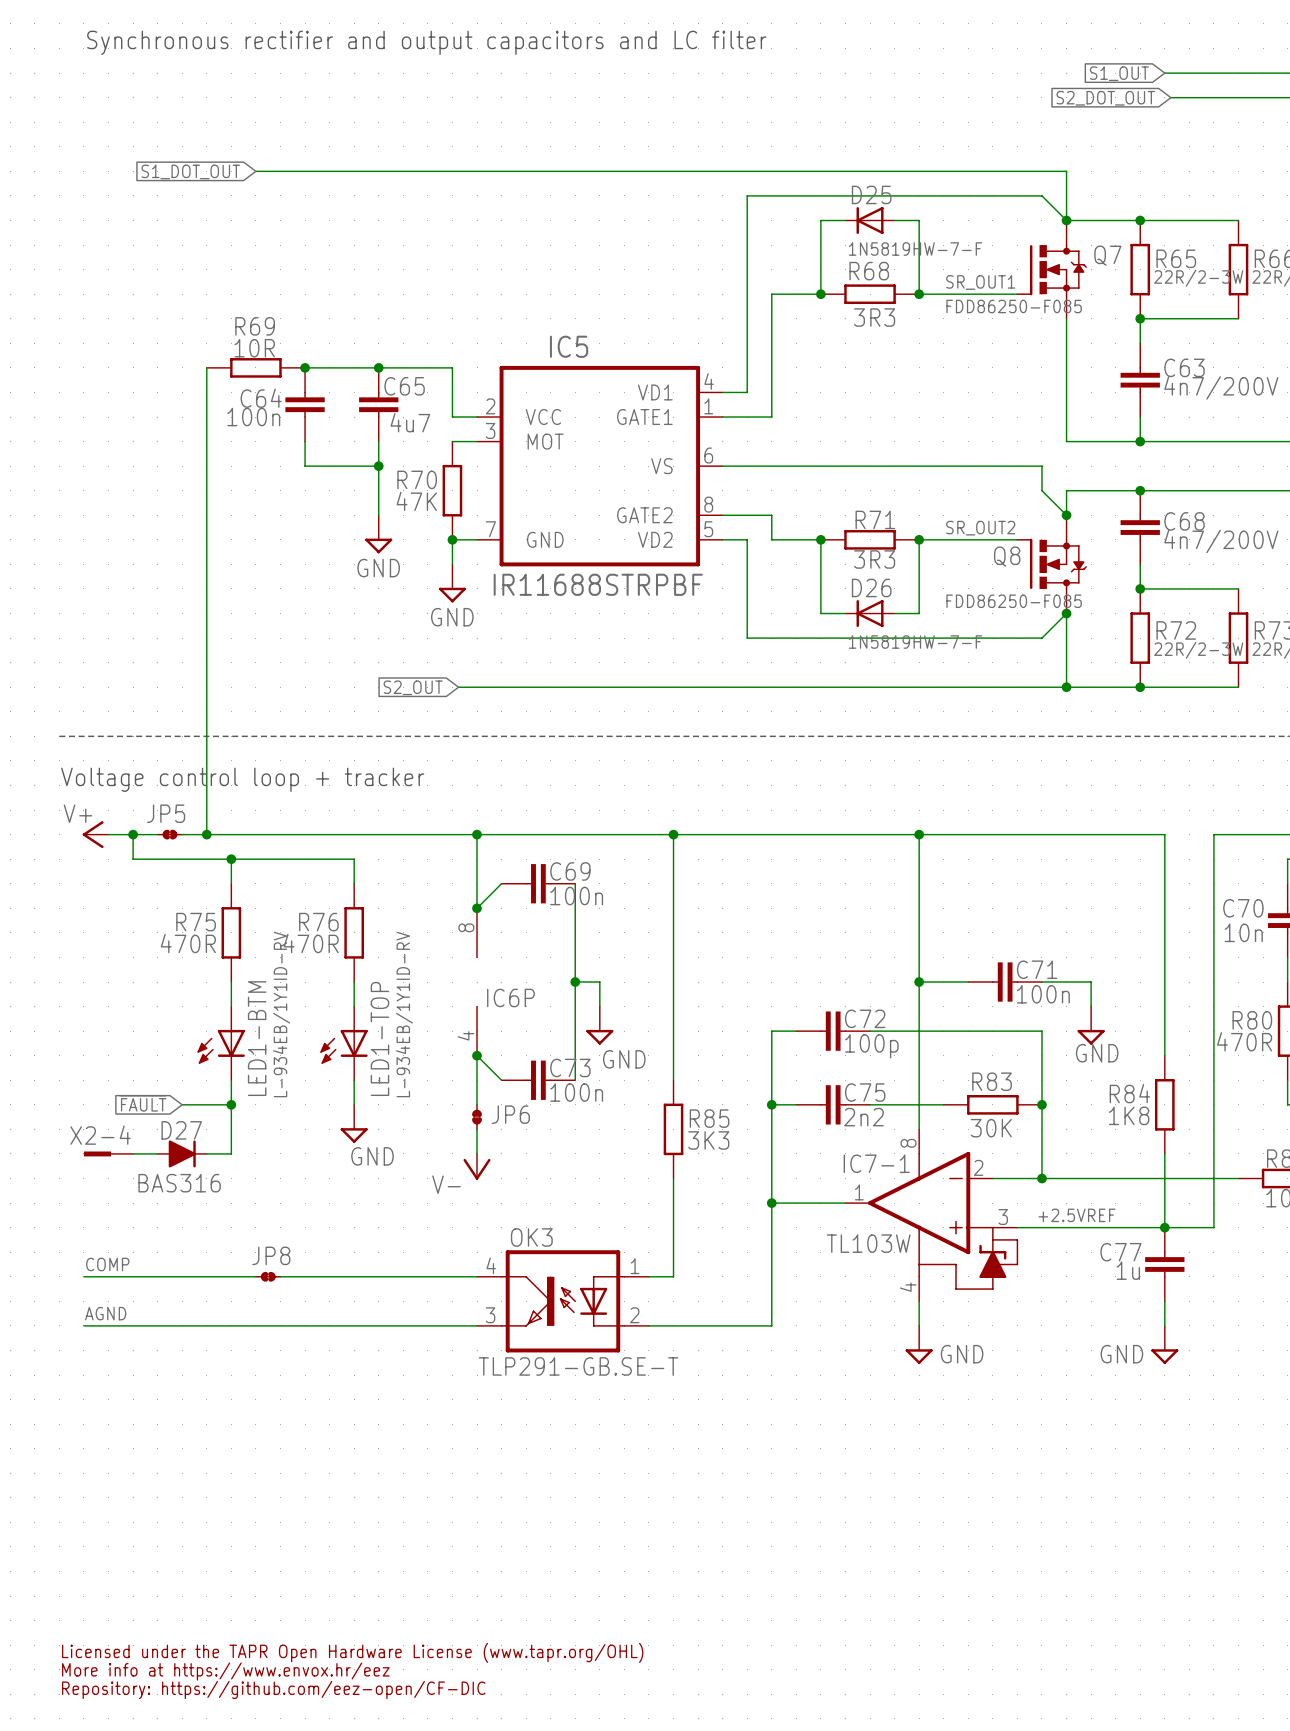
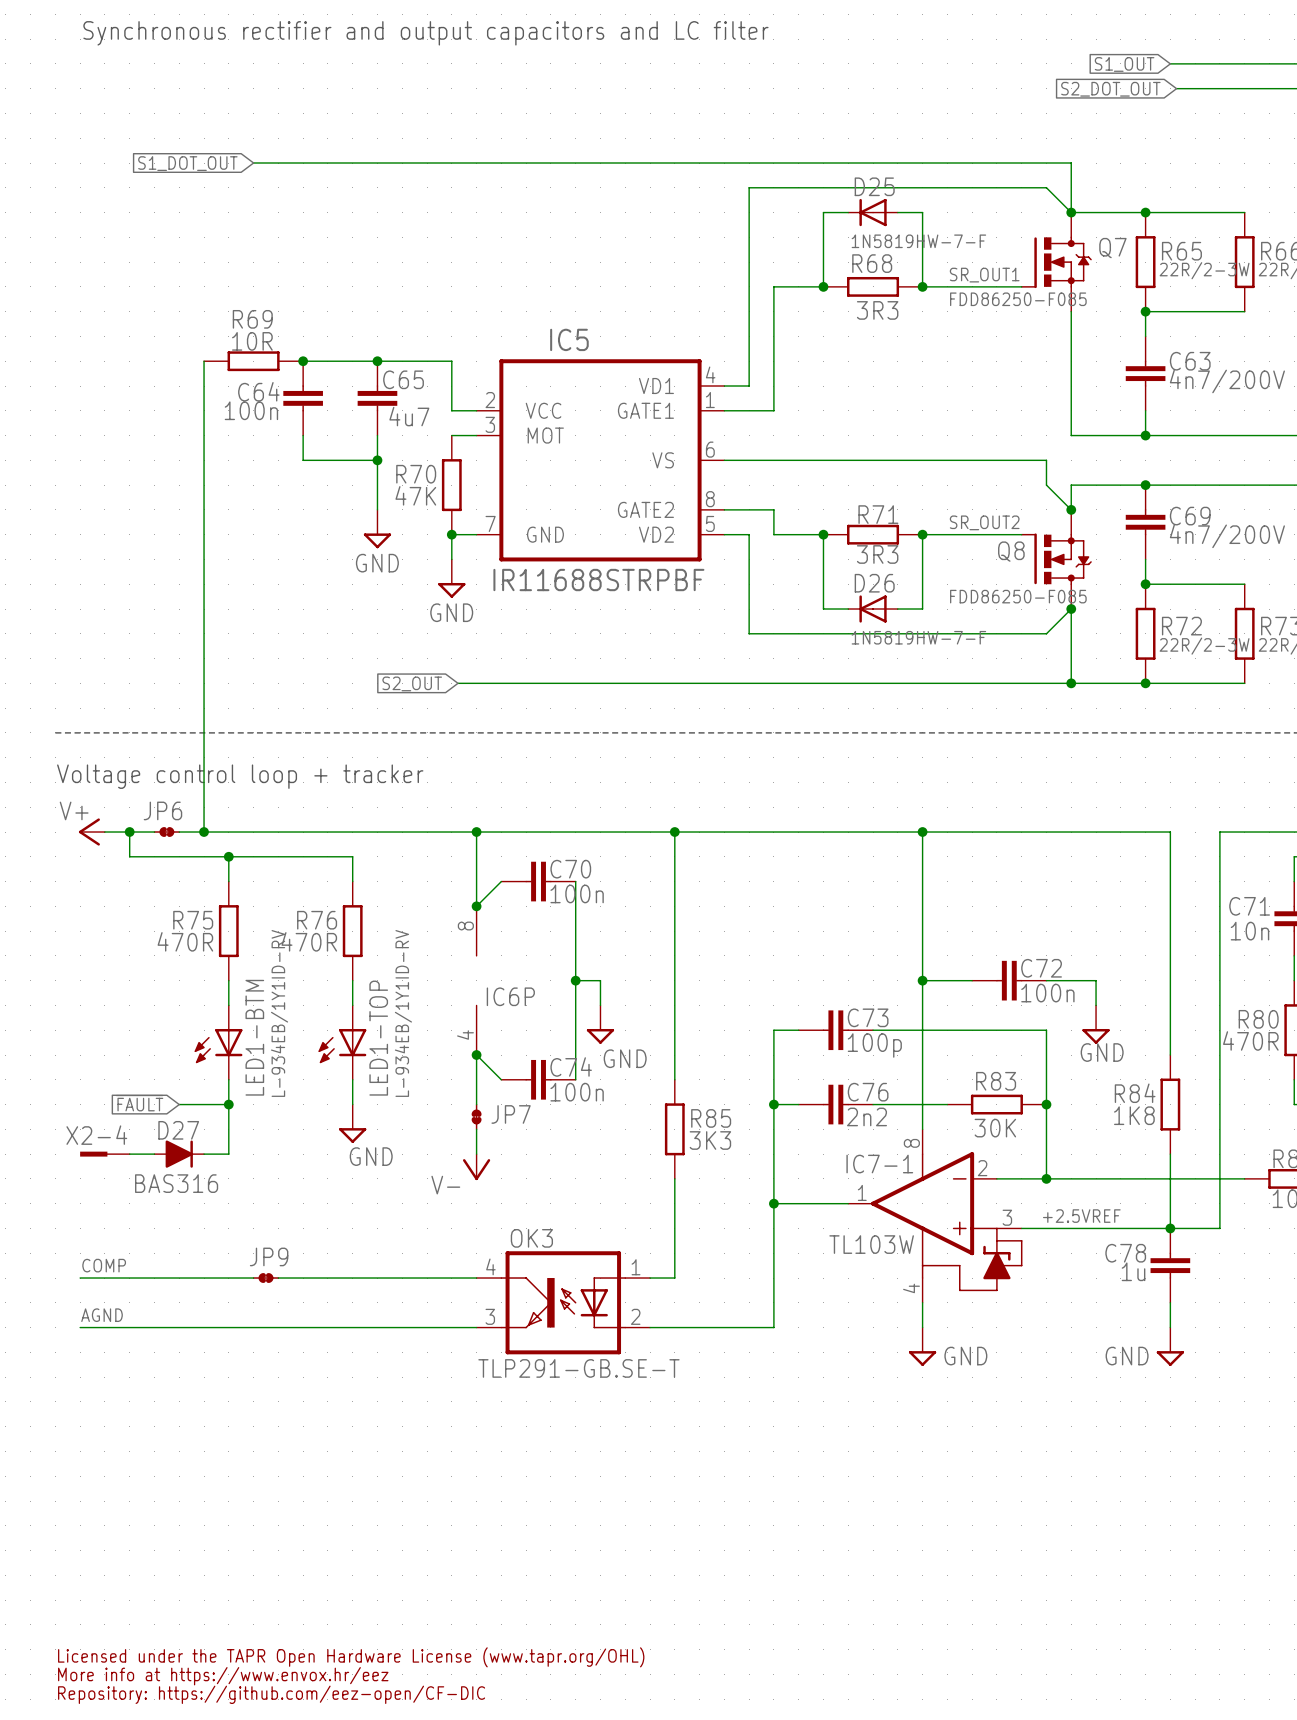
C68 name: C68 (1184, 521) -> C69 (1190, 516)
JP5 name: JP5 (166, 813) -> JP6 (162, 810)
C69 name: C69 (570, 871) -> C70 (570, 869)
C70 name: C70 (1243, 908) -> C71 (1249, 906)
C71 name: C71 (1037, 969) -> C72 (1041, 968)
C72 name: C72 (865, 1018) -> C73 (868, 1017)
C73 name: C73 (570, 1067) -> C74 (571, 1066)
C75 name: C75 (865, 1092) -> C76 (868, 1092)
JP6 name: JP6 (510, 1114) -> JP7 (511, 1114)
C77 name: C77 (1120, 1252) -> C78 (1125, 1253)
JP8 name: JP8 (271, 1255) -> JP9 (269, 1256)

